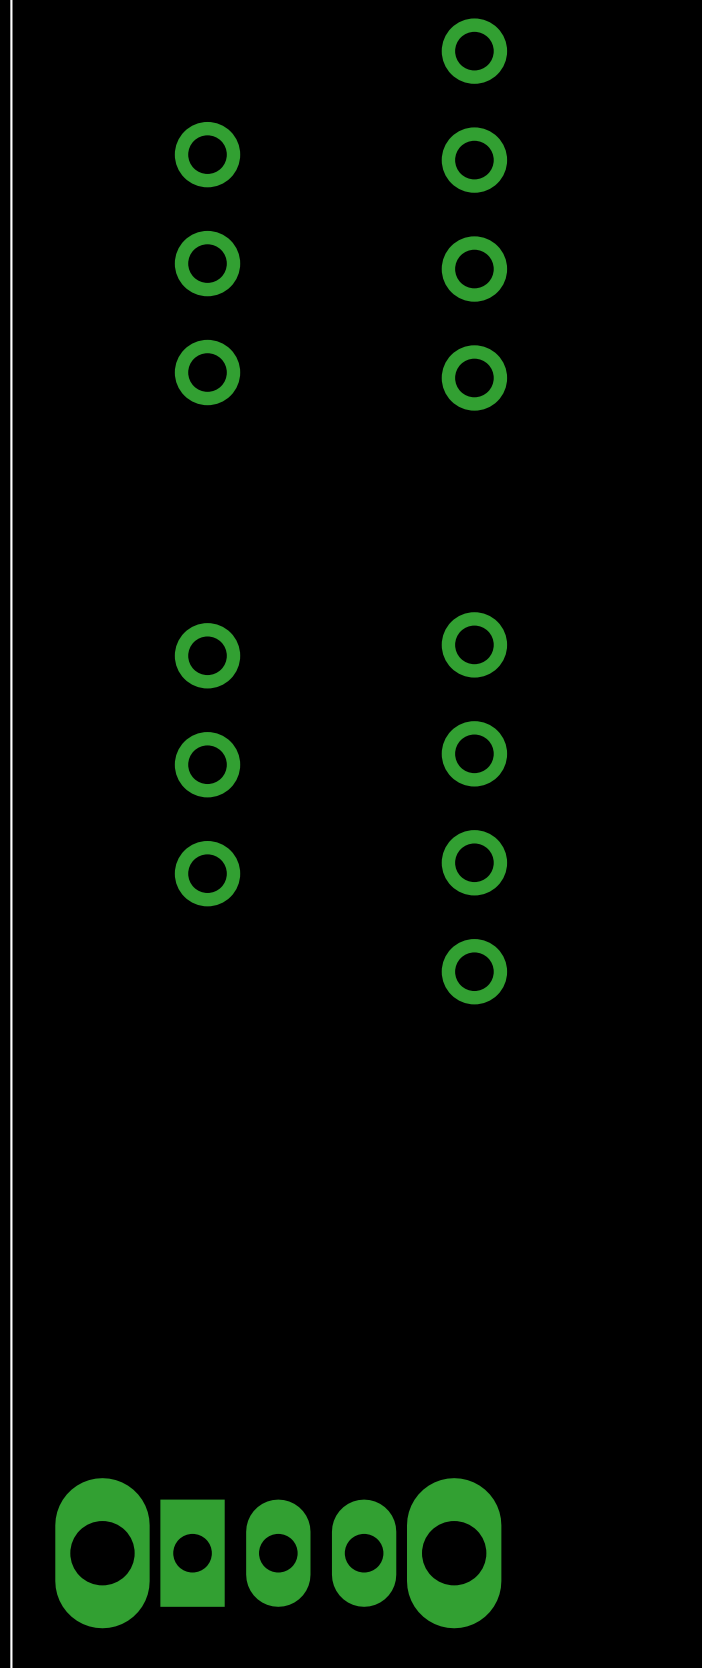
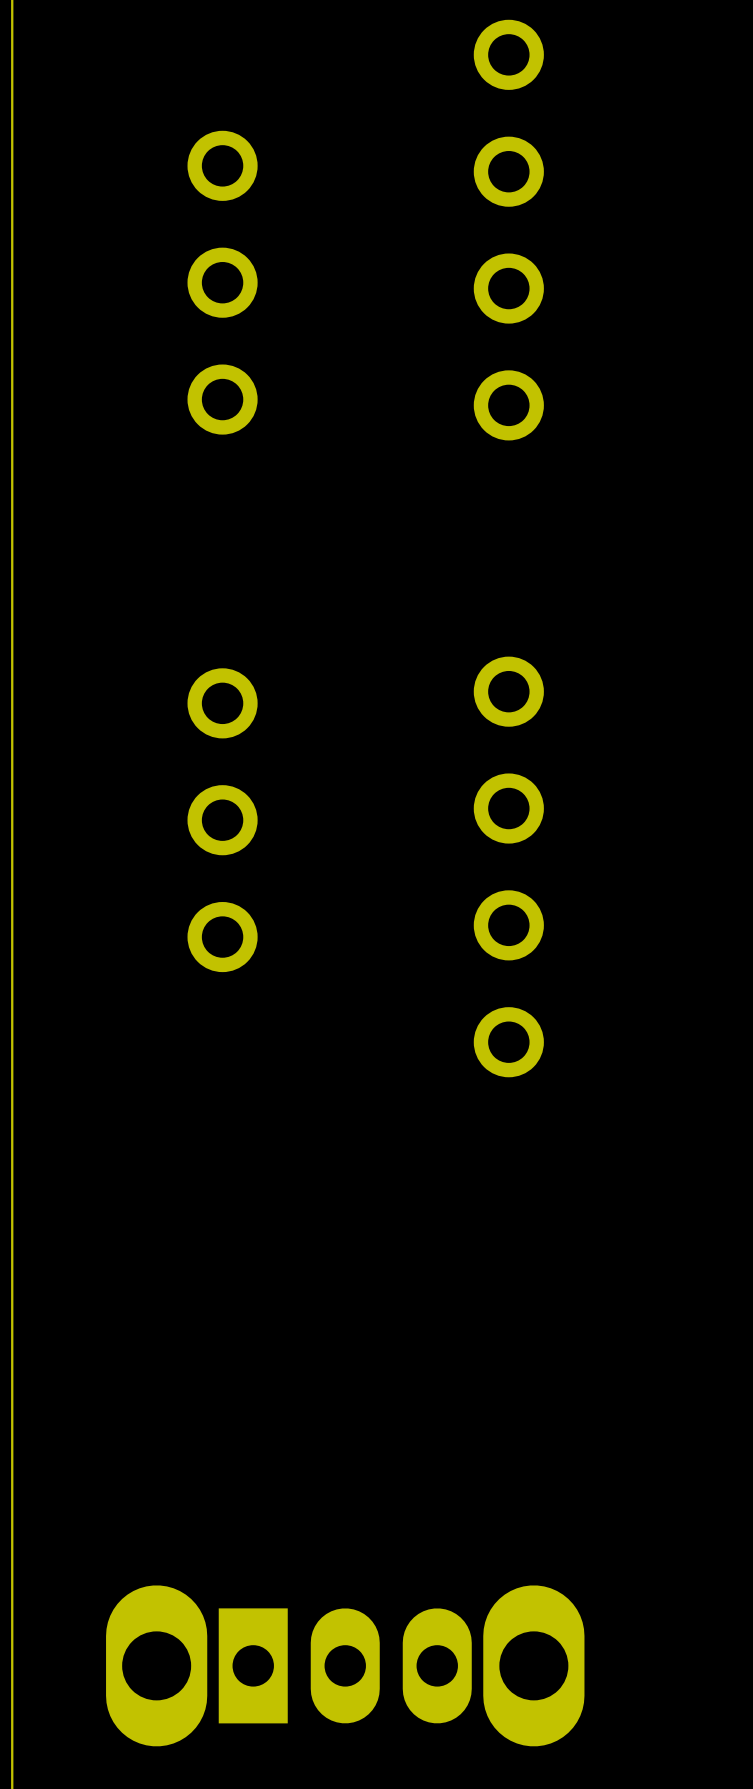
part position: (278, 1553) -> (345, 1665)

